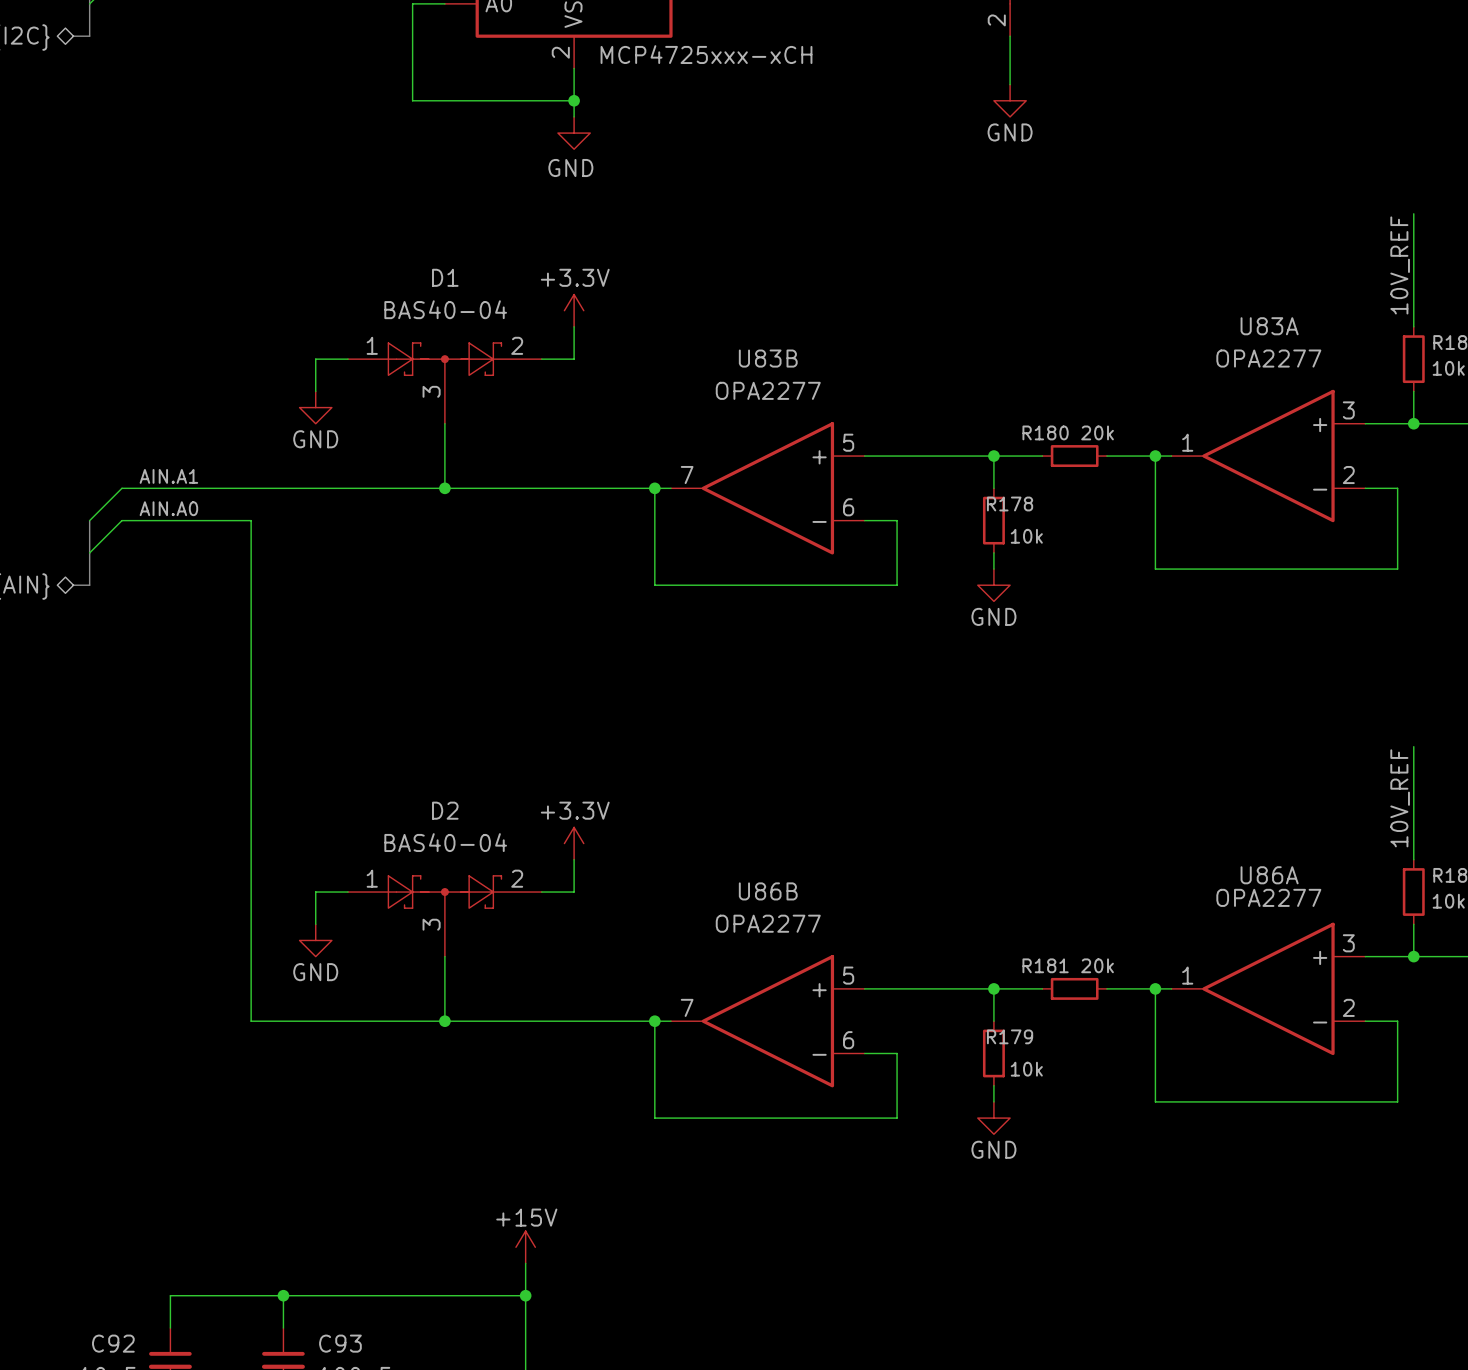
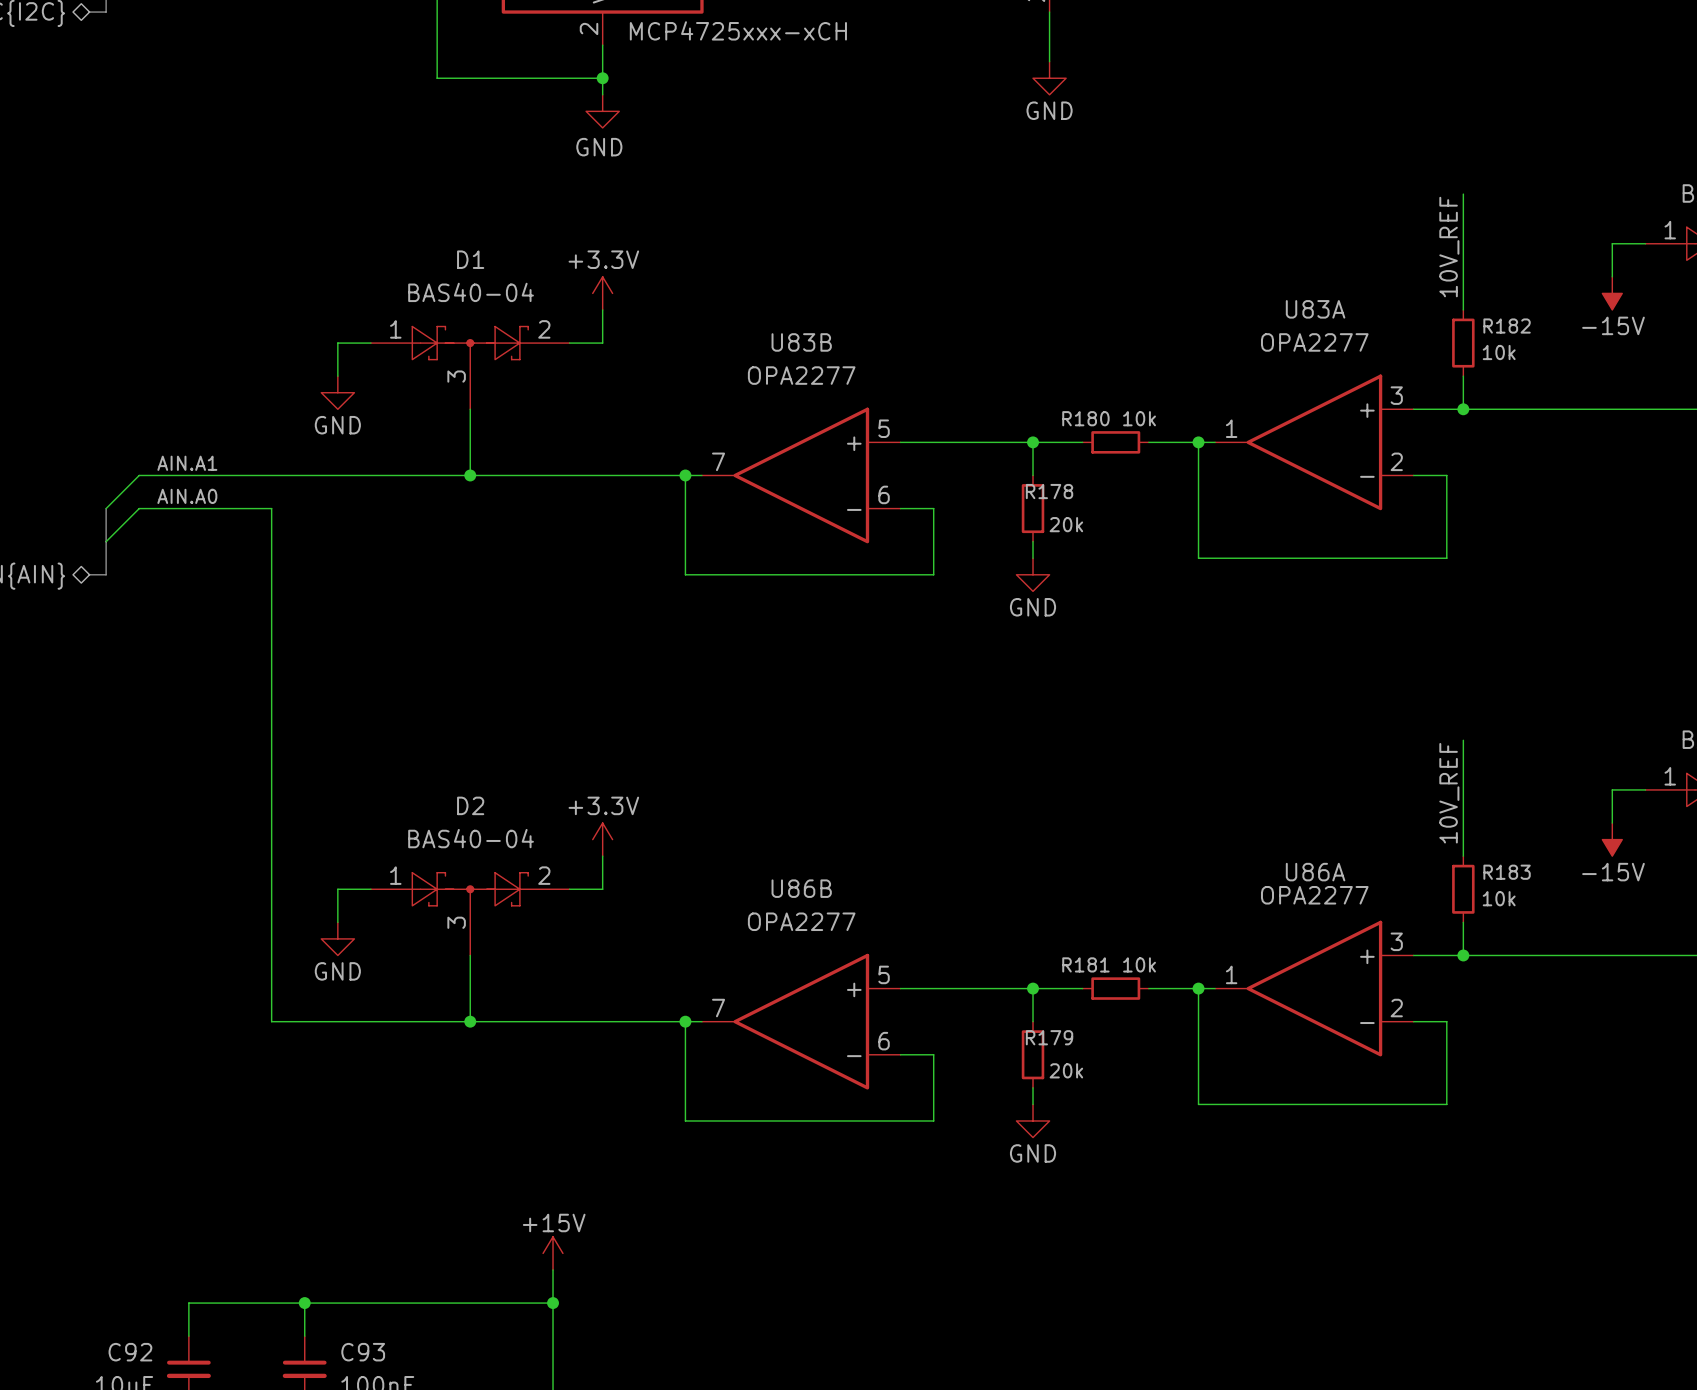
R180 value: 20k (1097, 432) -> 10k (1139, 418)
R178 value: 10k (1026, 536) -> 20k (1066, 524)
R181 value: 20k (1097, 965) -> 10k (1139, 964)
R179 value: 10k (1026, 1069) -> 20k (1066, 1070)

